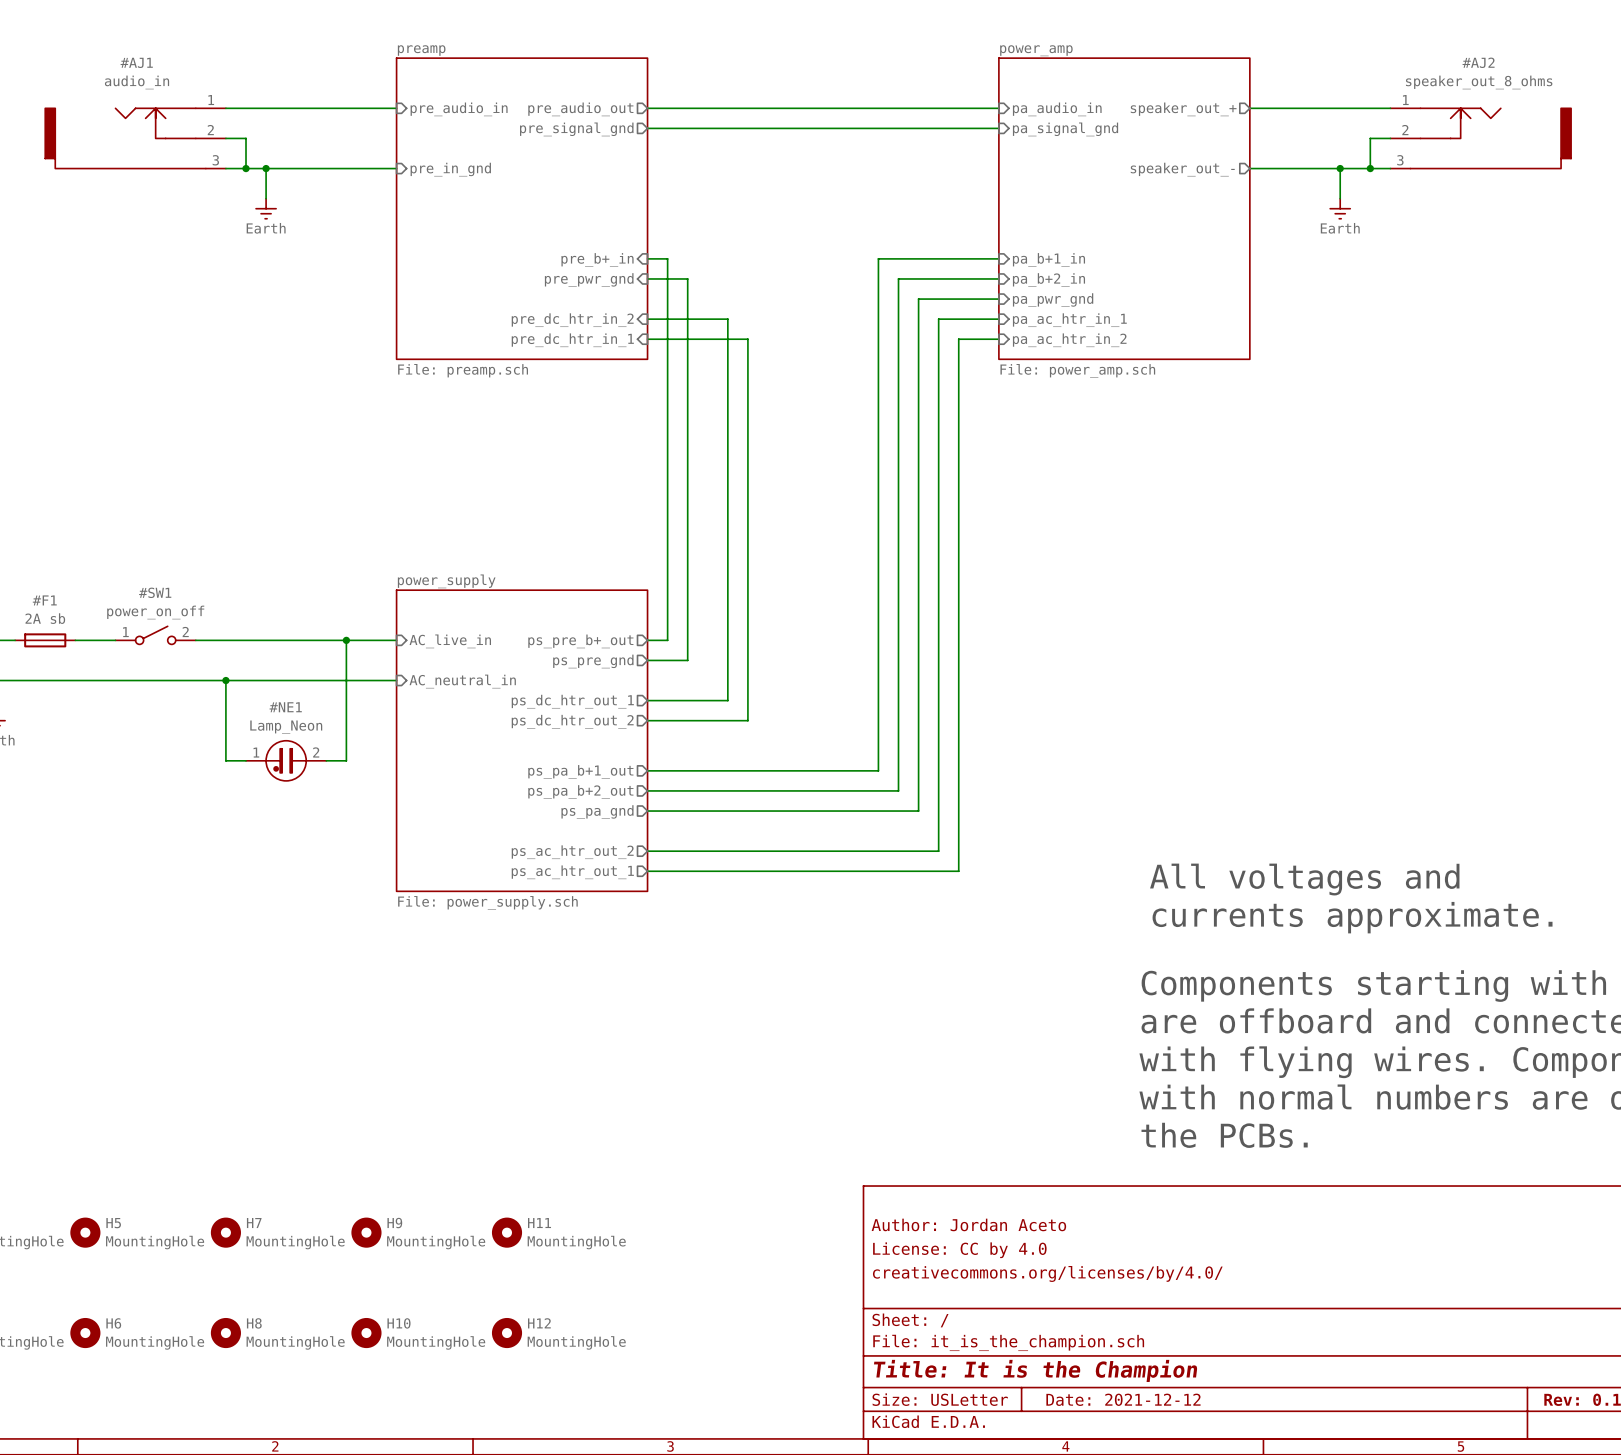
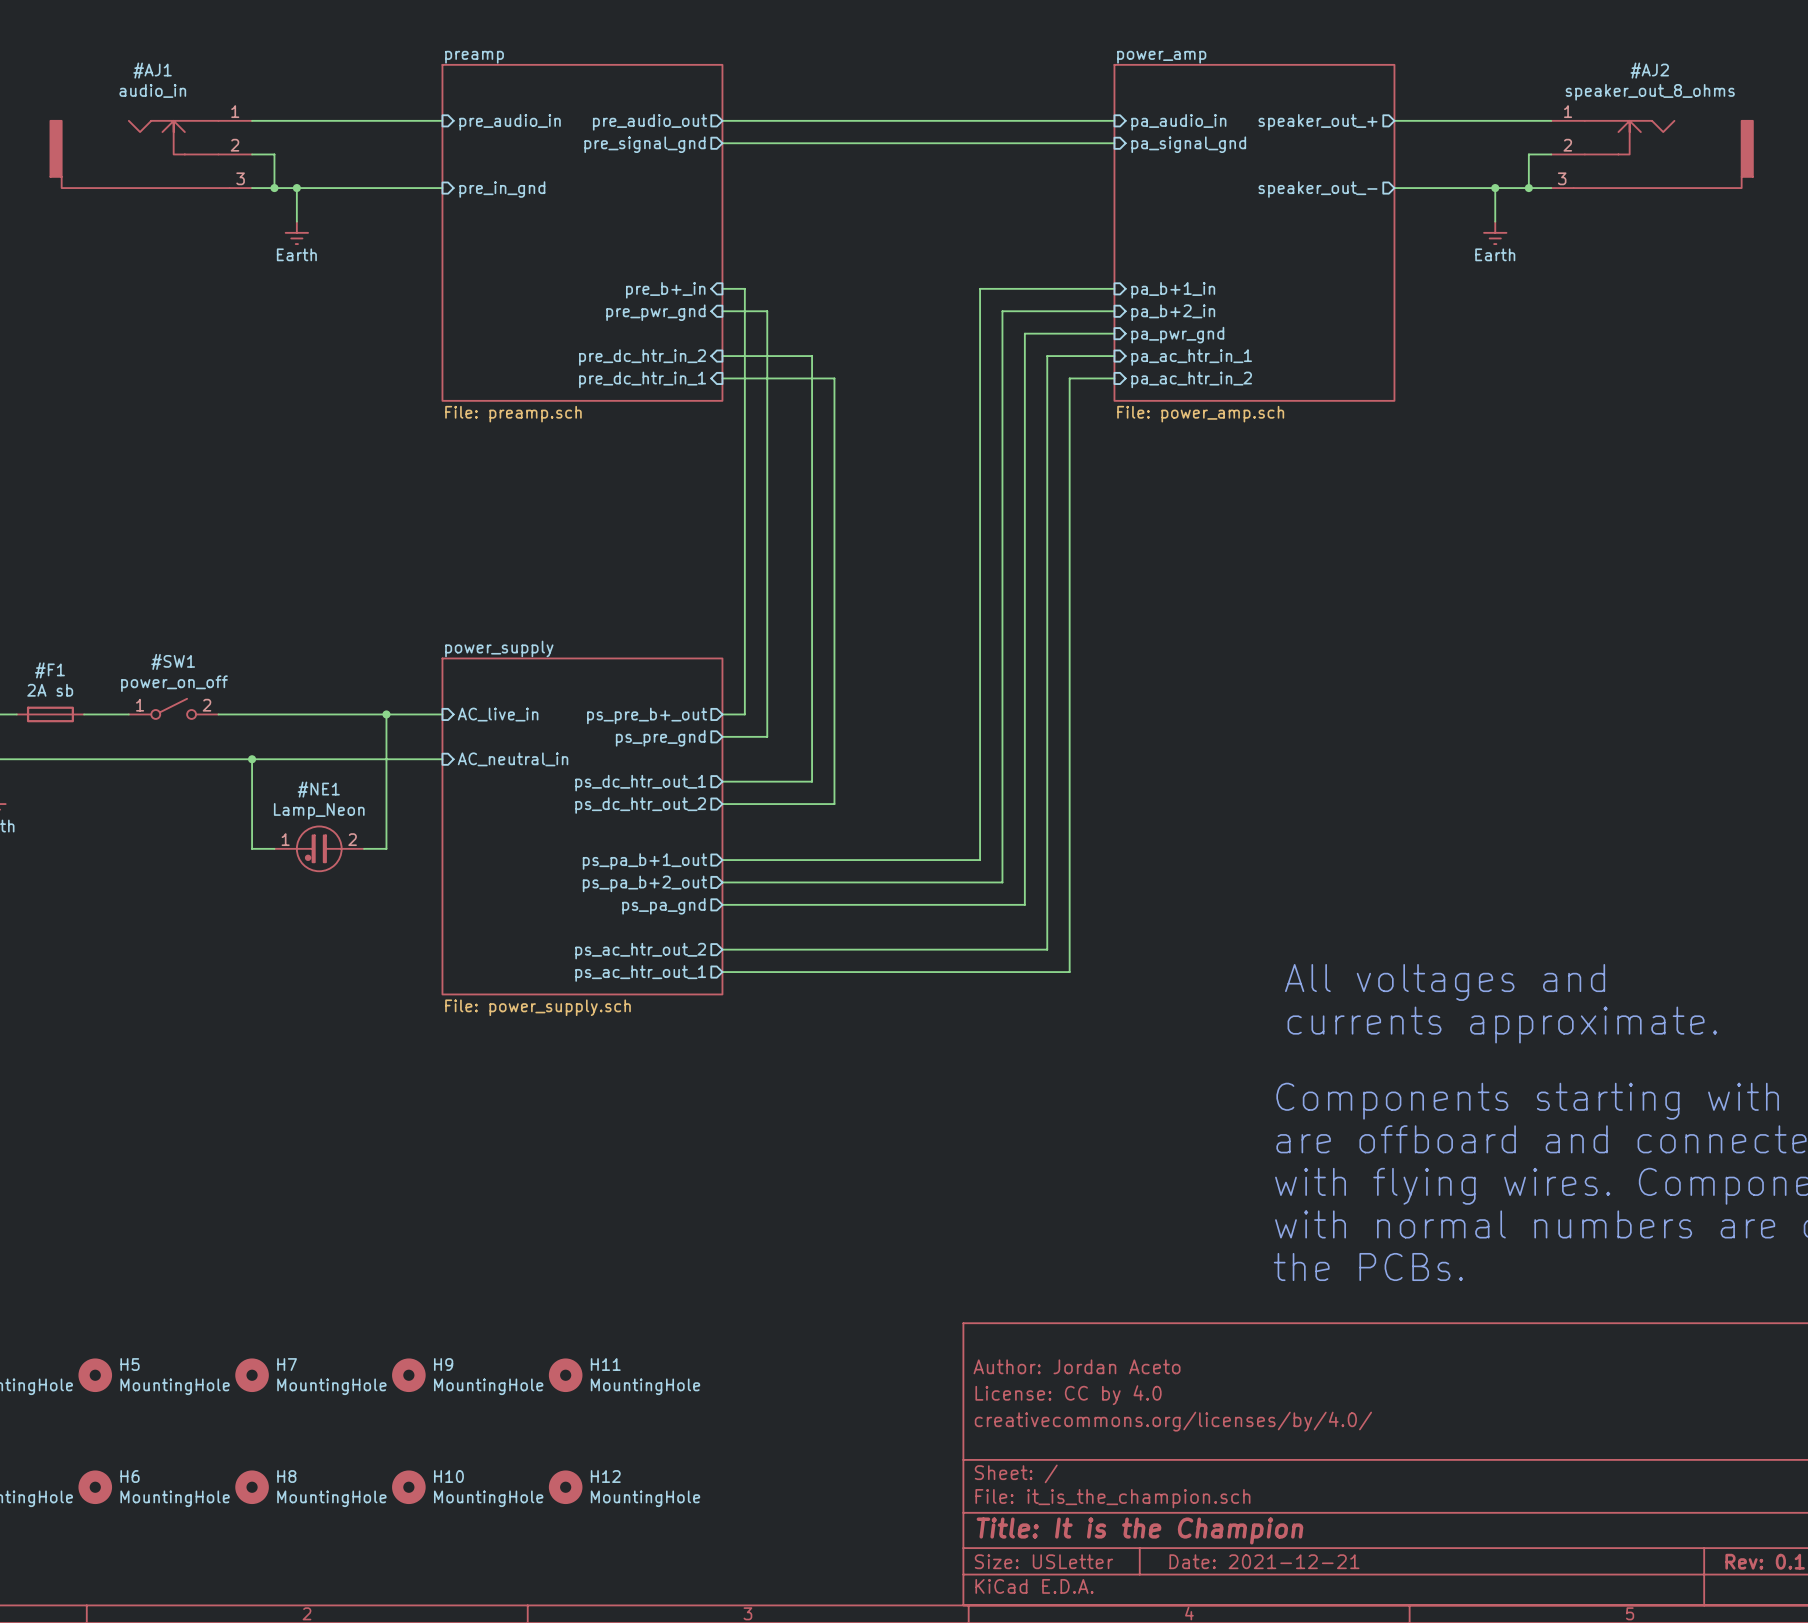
title block: Date: 2021-12-12 (1123, 1399) -> Date: 2021-12-21 (1264, 1561)

